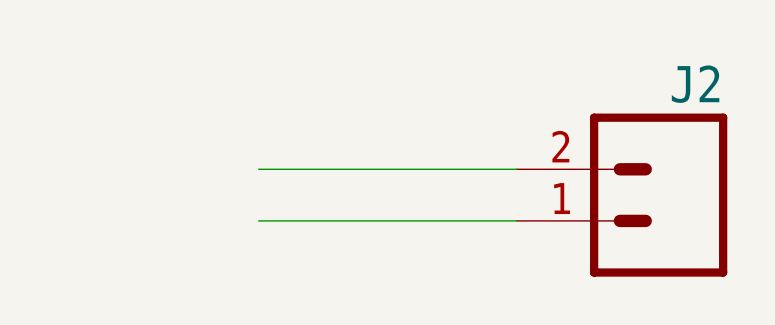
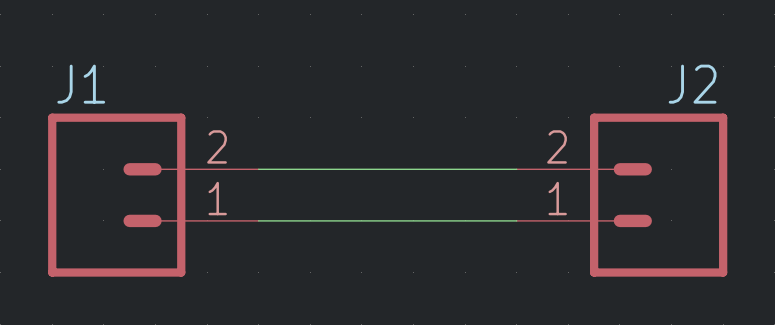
J1: none -> (153, 195)

